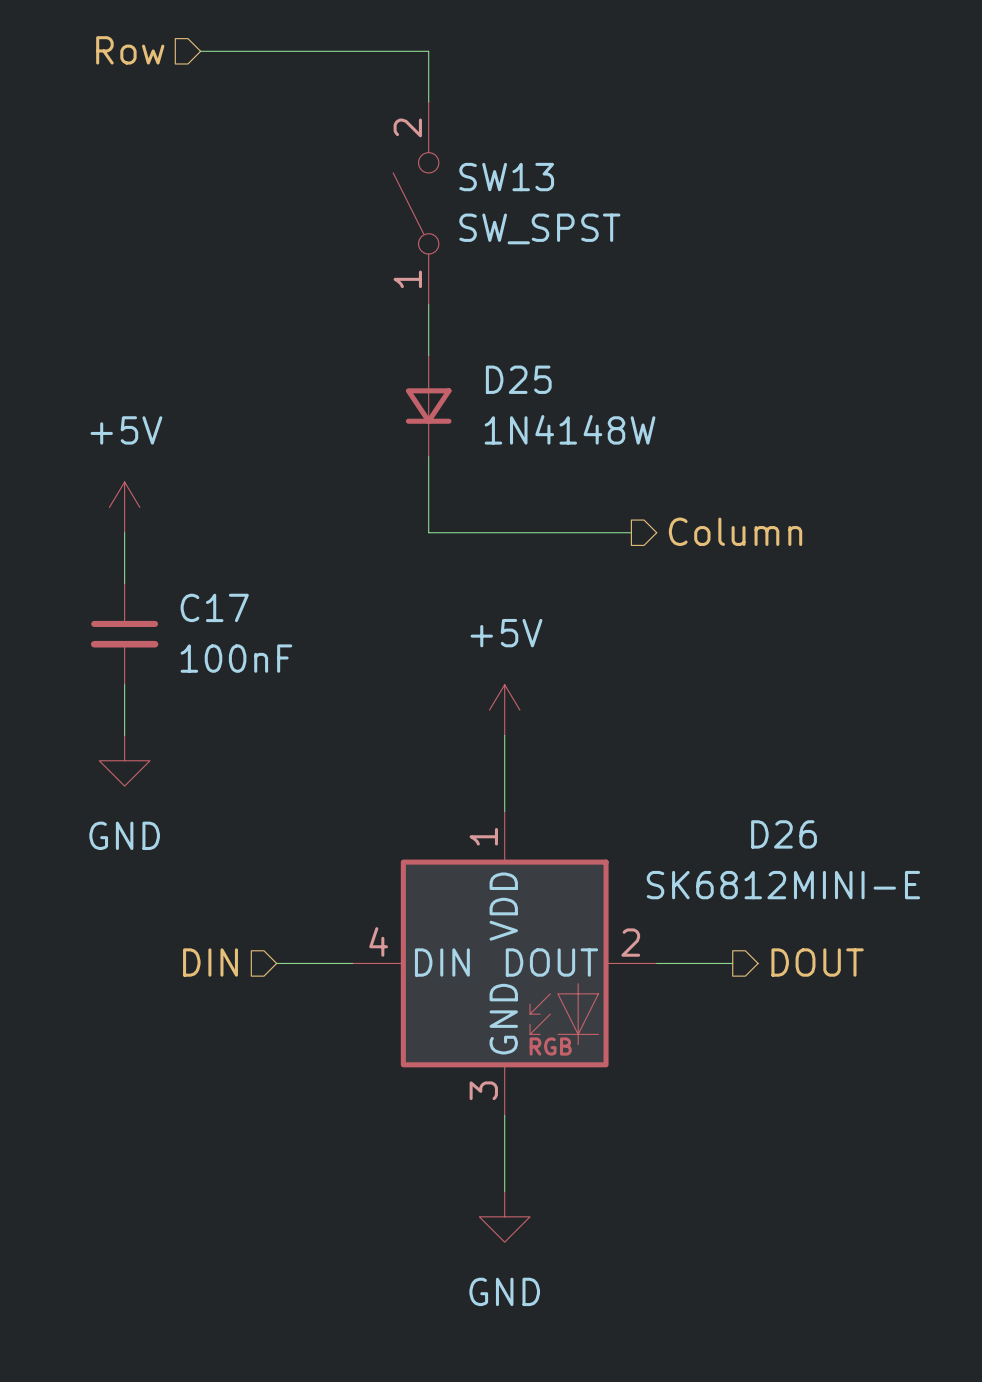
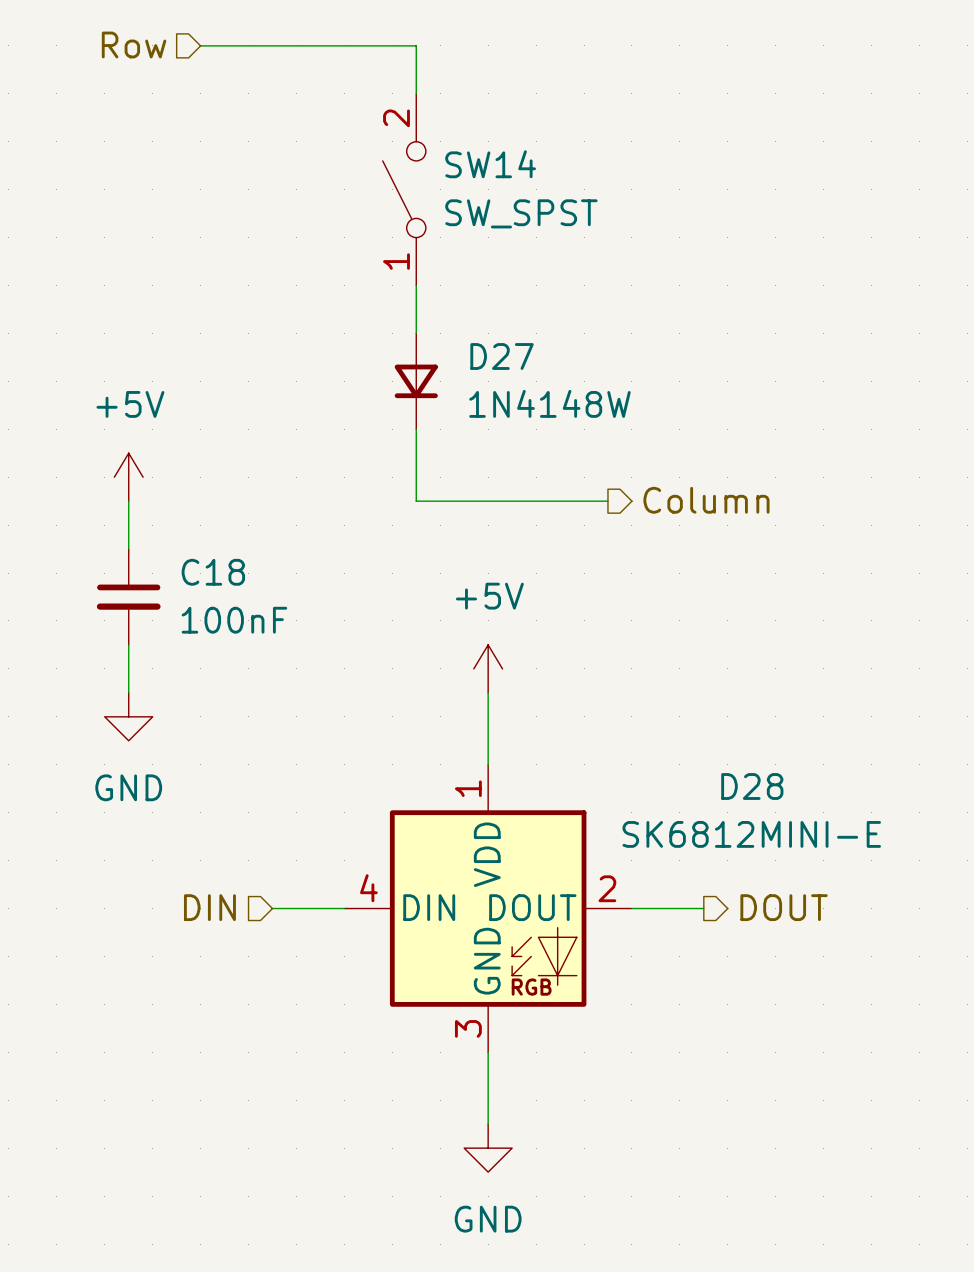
SW13 name: SW13 (506, 177) -> SW14 (490, 164)
D25 name: D25 (518, 379) -> D27 (502, 356)
C17 name: C17 (214, 607) -> C18 (213, 572)
D26 name: D26 (784, 834) -> D28 (752, 786)

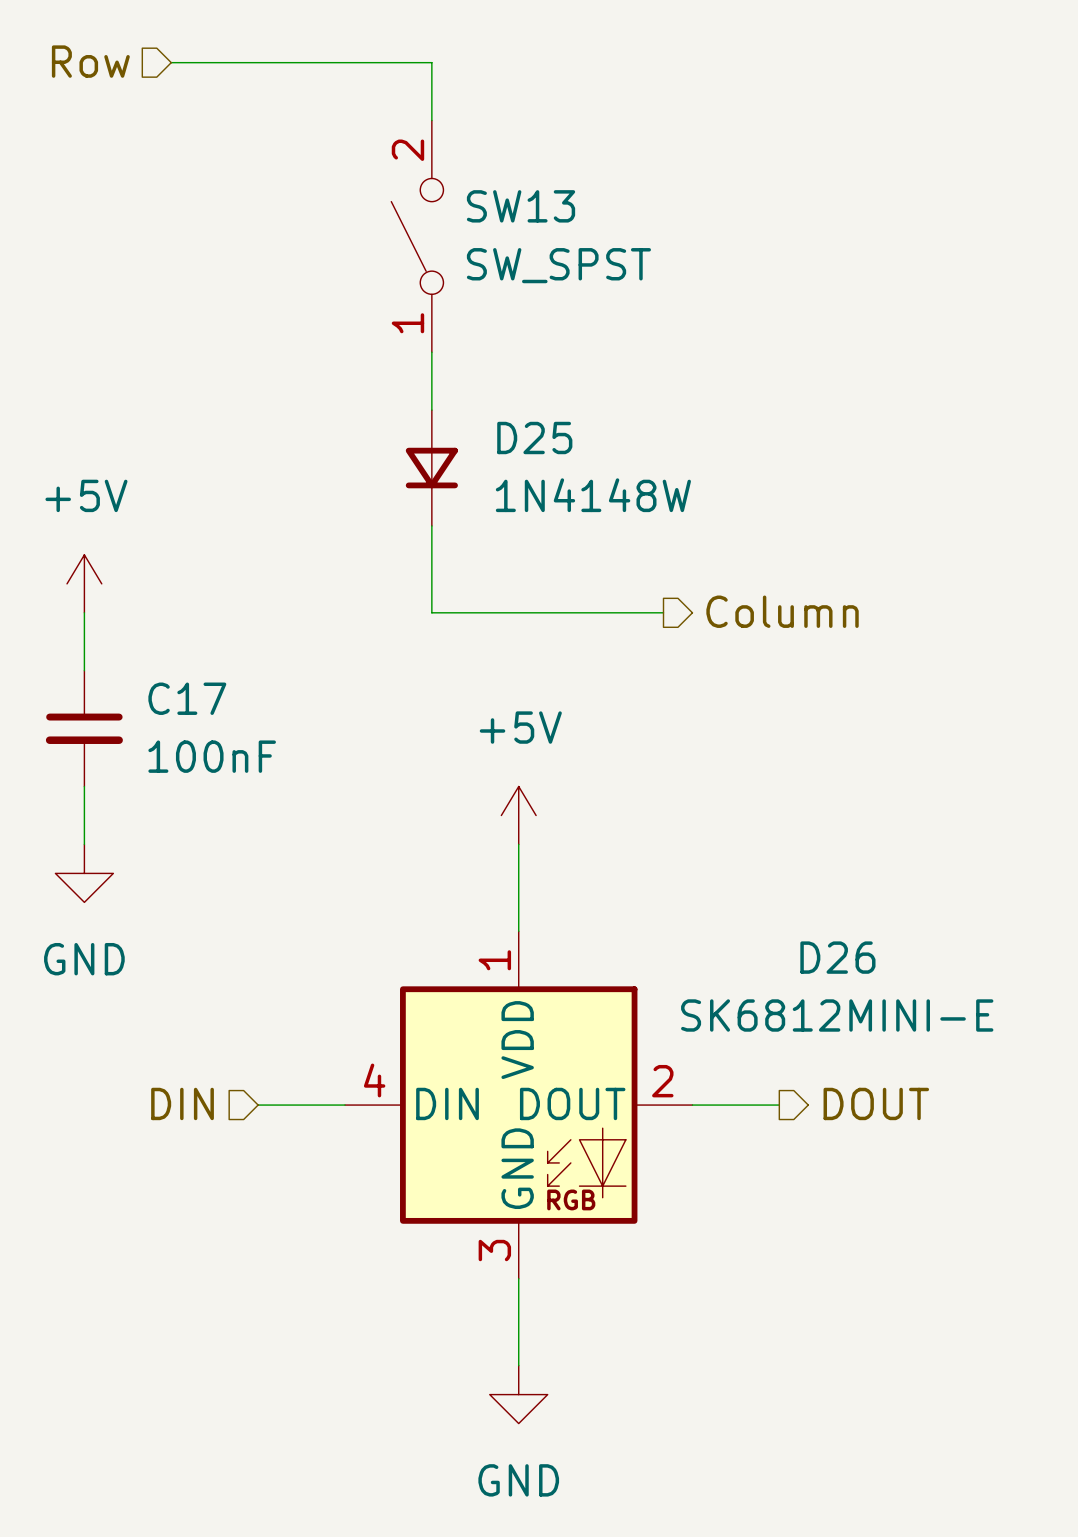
SW14 name: SW14 (490, 164) -> SW13 (521, 206)
D27 name: D27 (502, 356) -> D25 (534, 437)
C18 name: C18 (213, 572) -> C17 (187, 698)
D28 name: D28 (752, 786) -> D26 (837, 957)

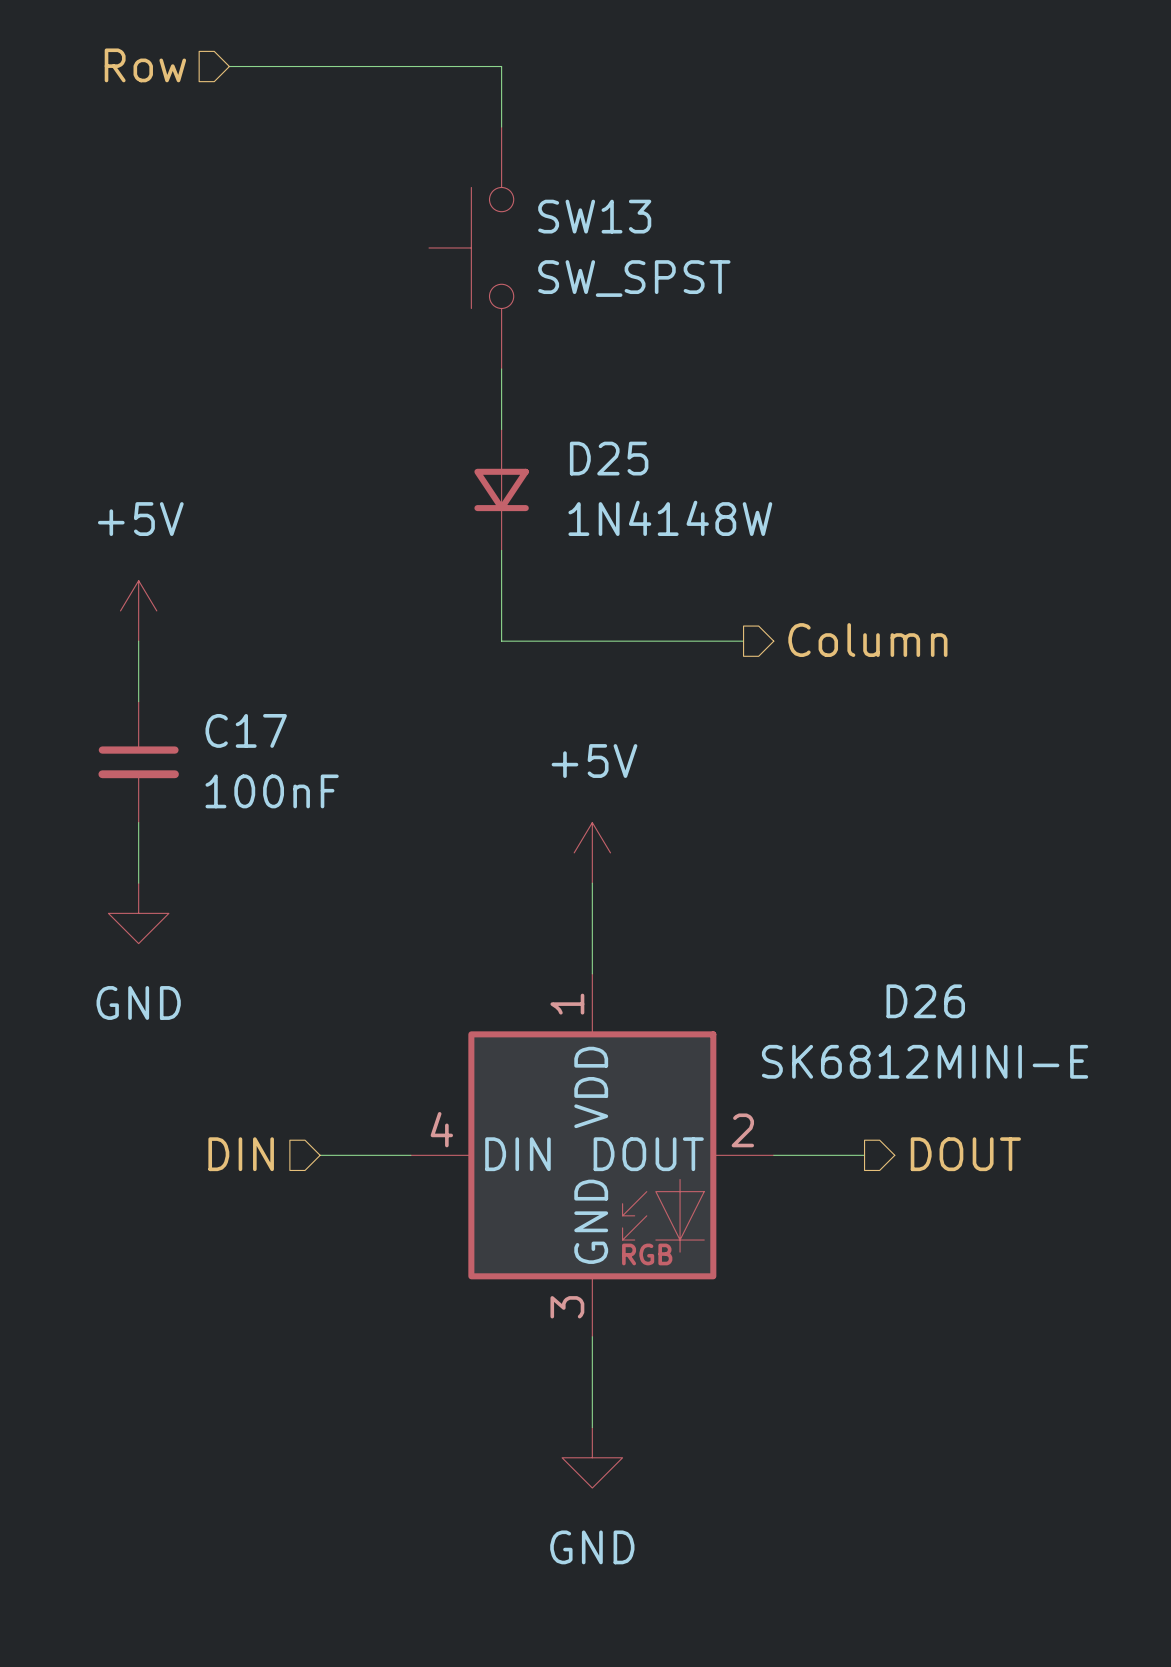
SW13 symbol: [391, 120, 444, 353] -> [429, 127, 514, 369]

